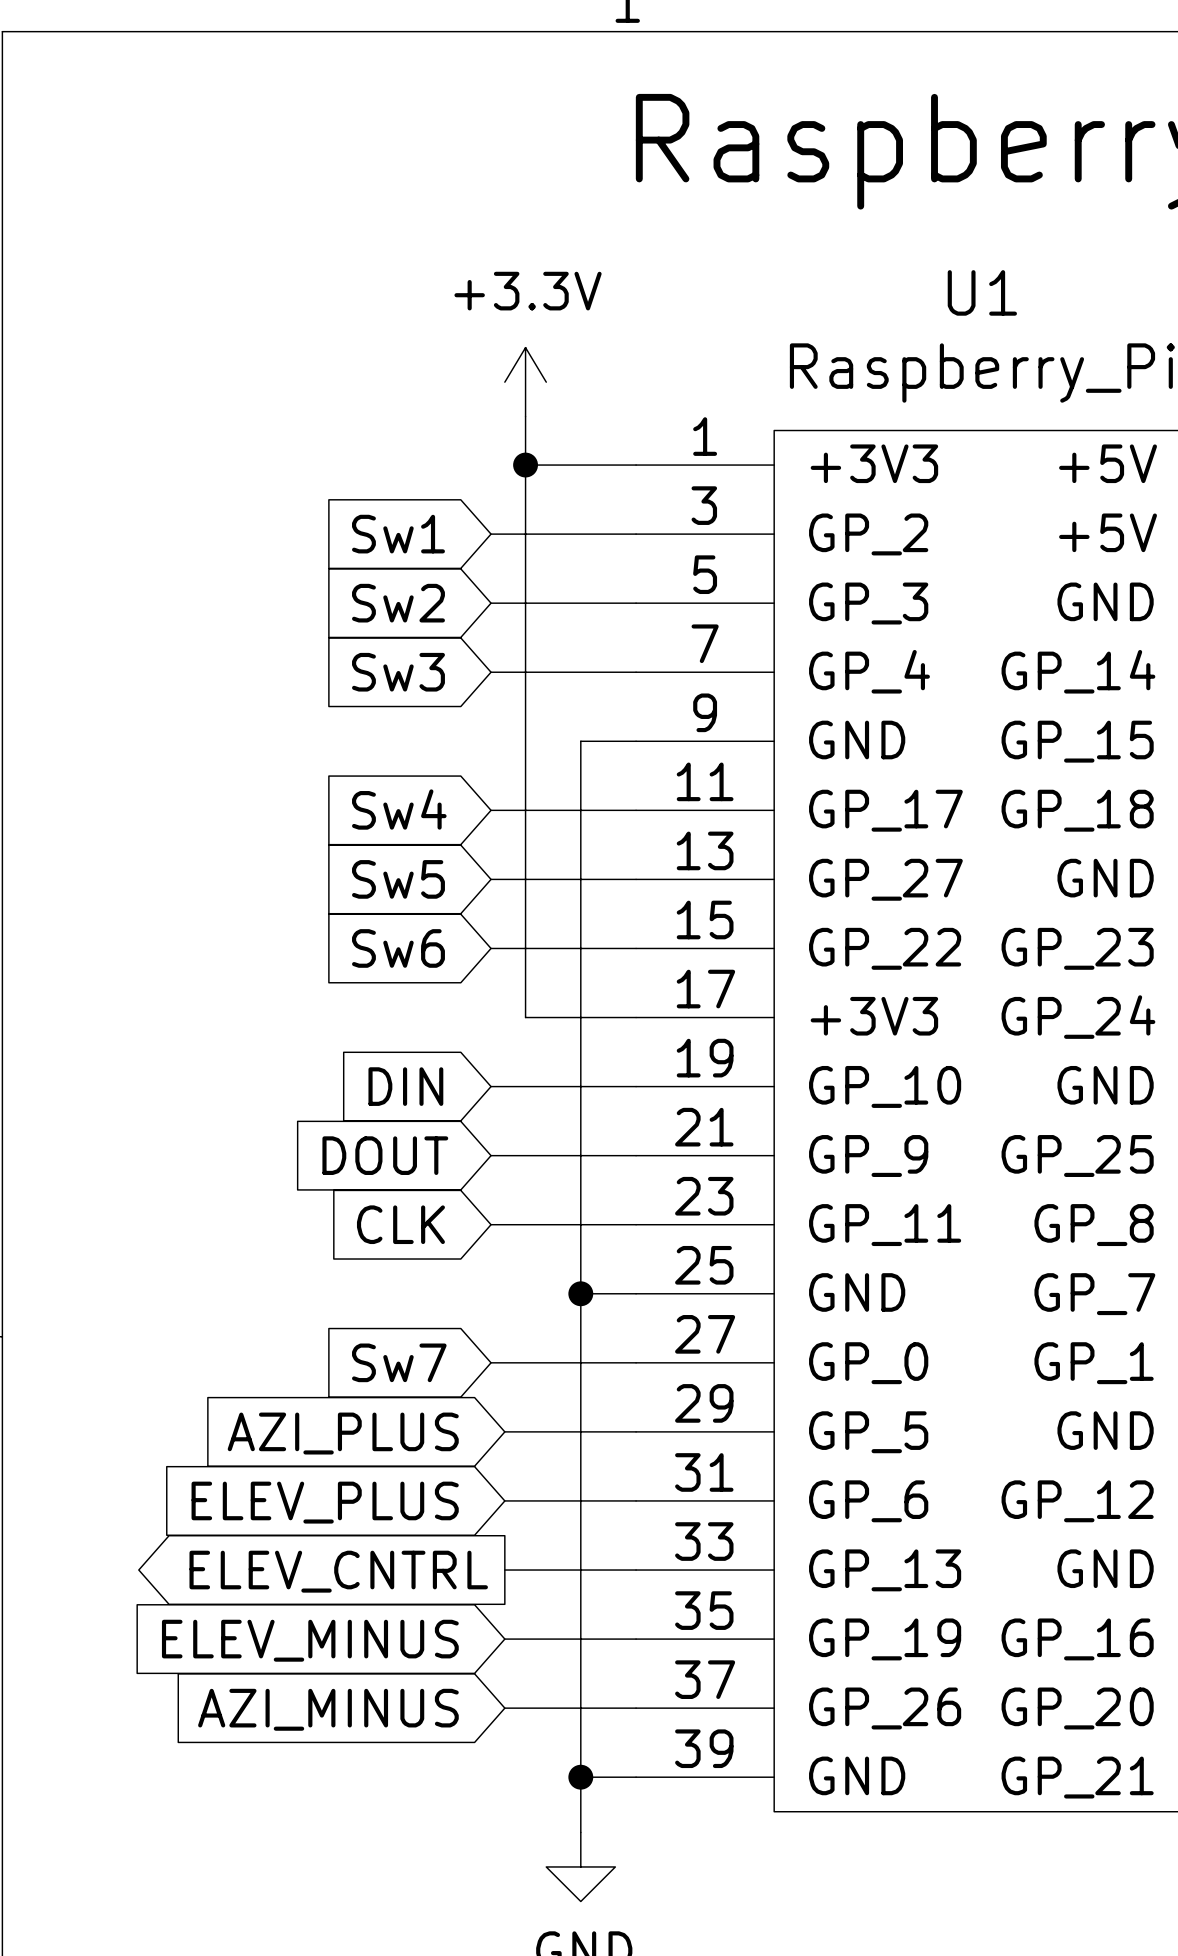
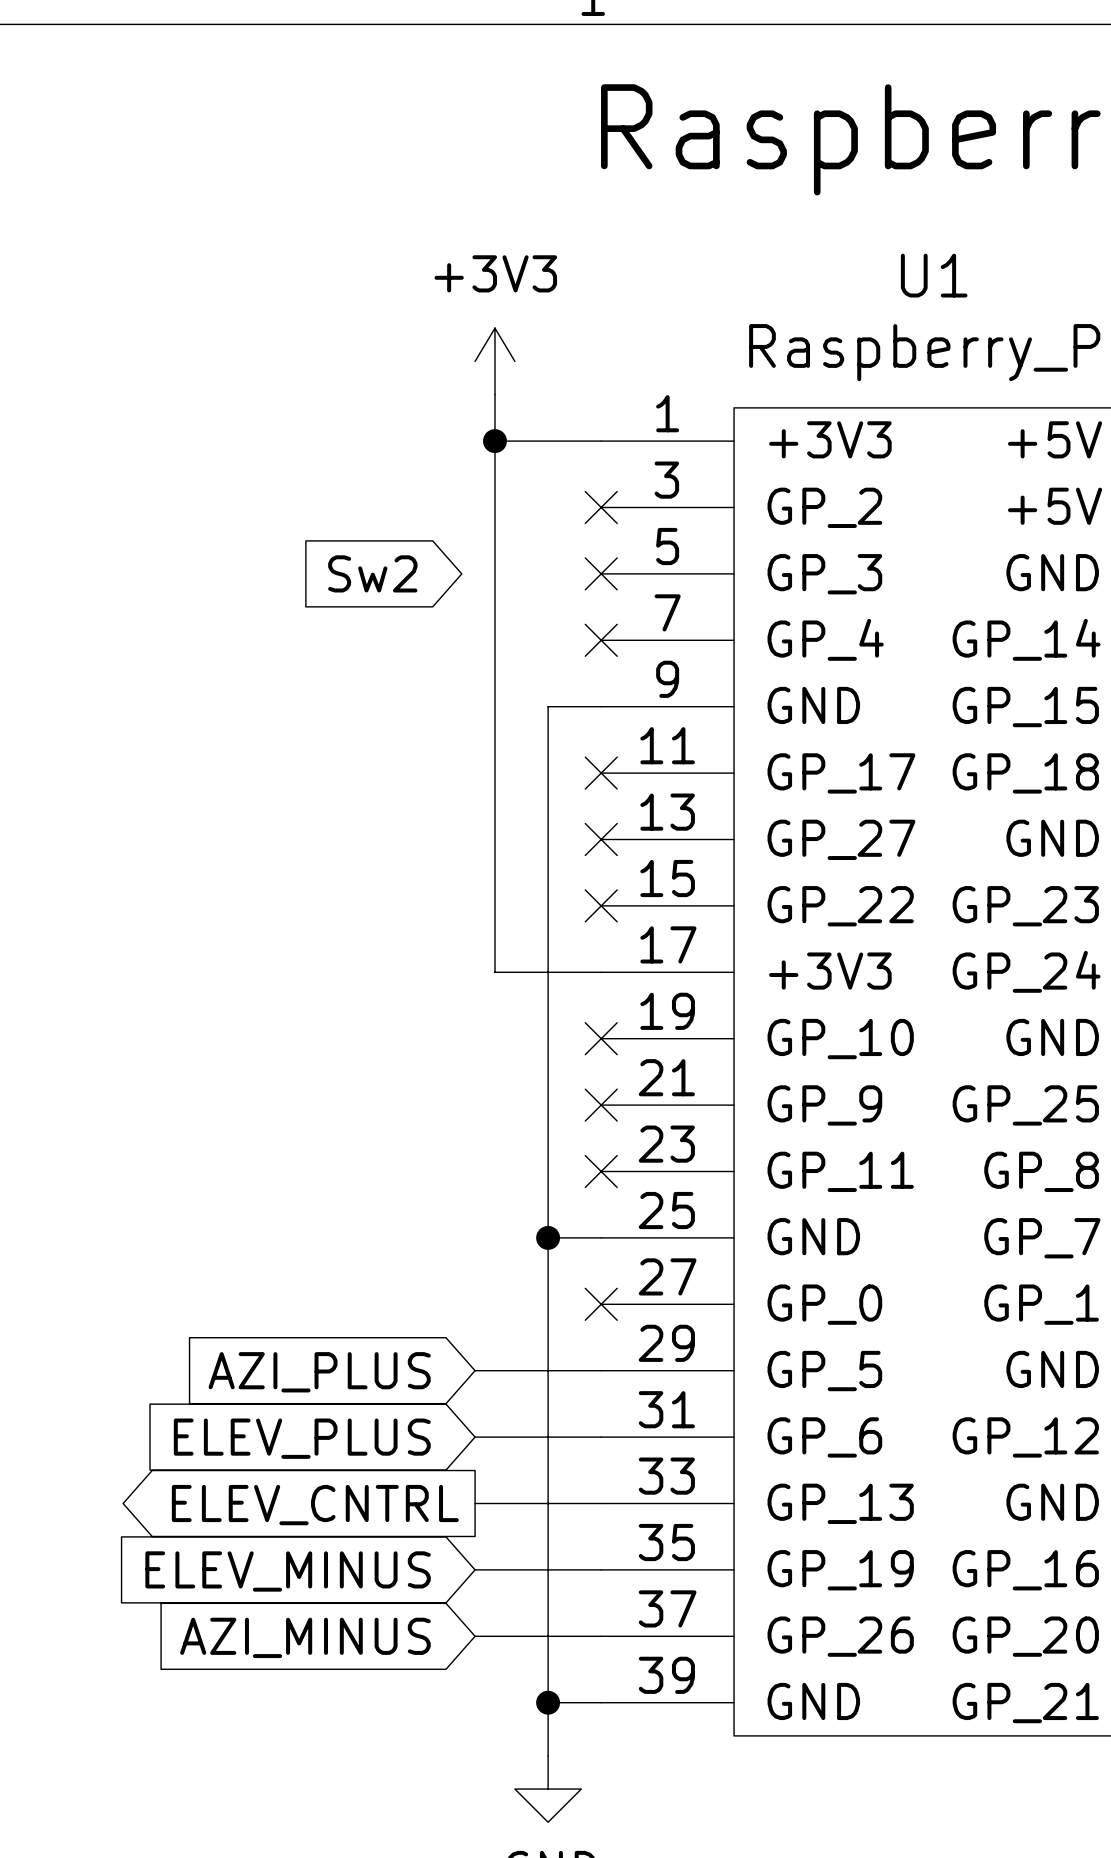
power symbol: +3.3V (525, 382) -> +3V3 (494, 361)
global label: Sw1 (398, 534) -> none
wire: (491, 534) (636, 534) -> none
no-connect mark: none -> (601, 507)
wire: (491, 603) (636, 603) -> none
no-connect mark: none -> (601, 573)
global label: Sw3 (398, 672) -> none
wire: (491, 672) (636, 672) -> none
no-connect mark: none -> (601, 640)
global label: Sw4 (399, 809) -> none
wire: (491, 810) (636, 810) -> none
no-connect mark: none -> (601, 773)
global label: Sw5 (398, 879) -> none
wire: (491, 879) (636, 879) -> none
no-connect mark: none -> (601, 839)
global label: Sw6 (398, 948) -> none
wire: (491, 948) (636, 948) -> none
no-connect mark: none -> (601, 905)
global label: DIN (405, 1086) -> none
wire: (491, 1086) (636, 1086) -> none
no-connect mark: none -> (601, 1038)
global label: DOUT (385, 1155) -> none
wire: (491, 1155) (636, 1155) -> none
no-connect mark: none -> (601, 1105)
global label: CLK (400, 1224) -> none
wire: (491, 1224) (636, 1224) -> none
no-connect mark: none -> (601, 1171)
global label: Sw7 (399, 1362) -> none
wire: (491, 1362) (636, 1362) -> none
no-connect mark: none -> (601, 1304)

